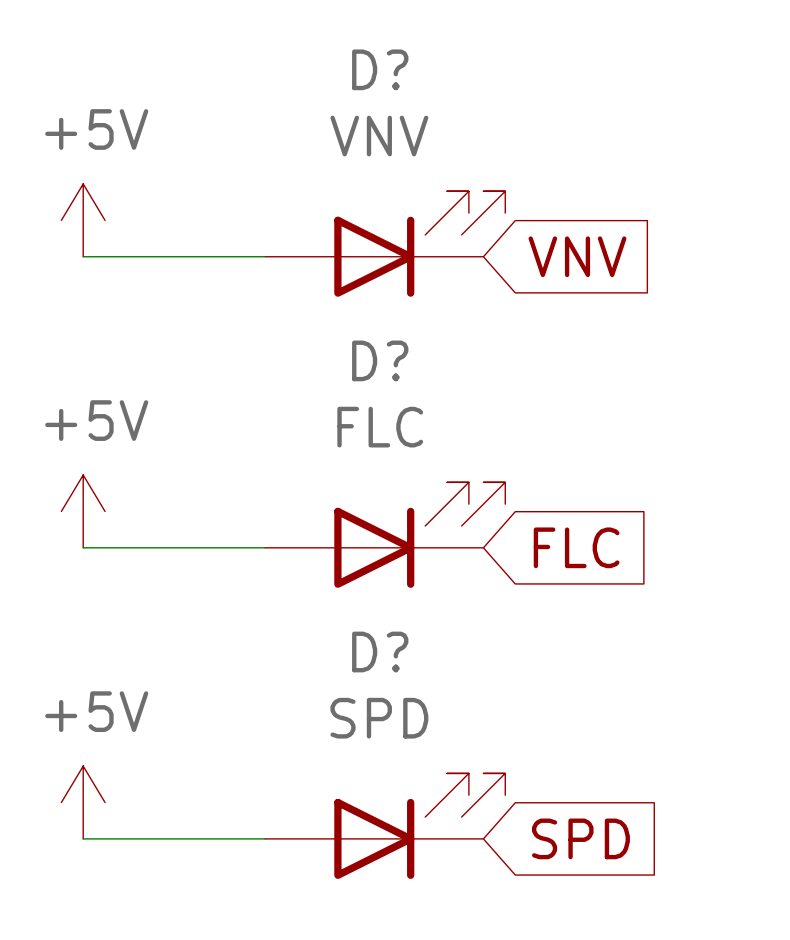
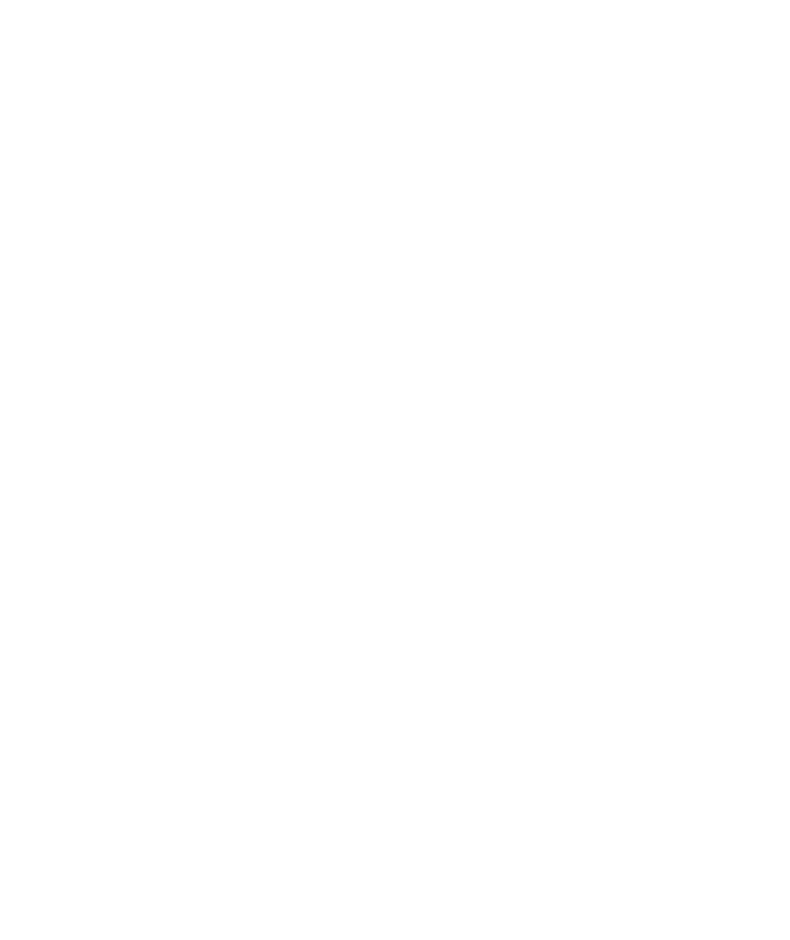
power symbol: +5V (83, 220) -> none
D?: VNV (385, 244) -> none
wire: (83, 256) (265, 256) -> none
global label: VNV (577, 256) -> none
power symbol: +5V (83, 511) -> none
D?: FLC (385, 535) -> none
wire: (83, 547) (265, 547) -> none
global label: FLC (576, 547) -> none
power symbol: +5V (83, 802) -> none
D?: SPD (385, 826) -> none
wire: (83, 838) (265, 838) -> none
global label: SPD (580, 838) -> none

